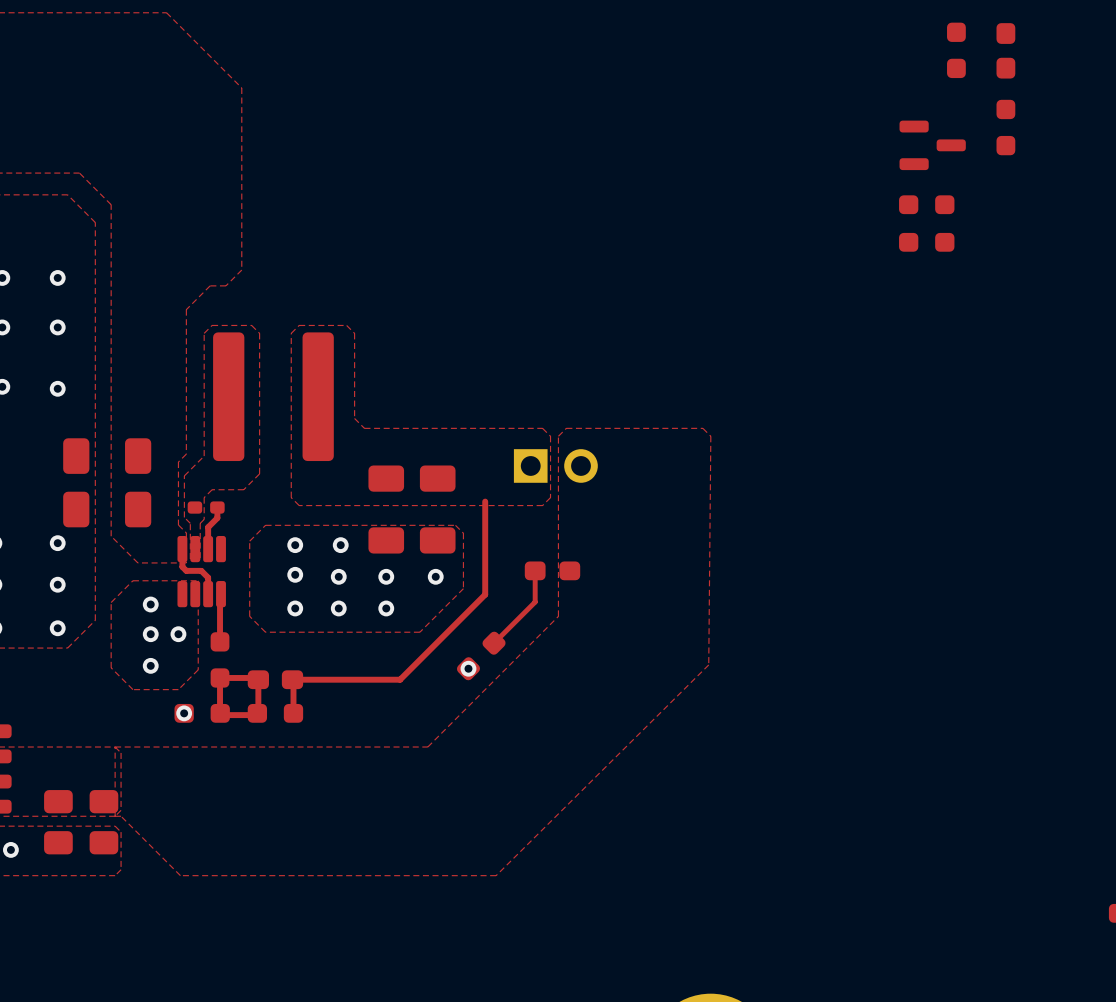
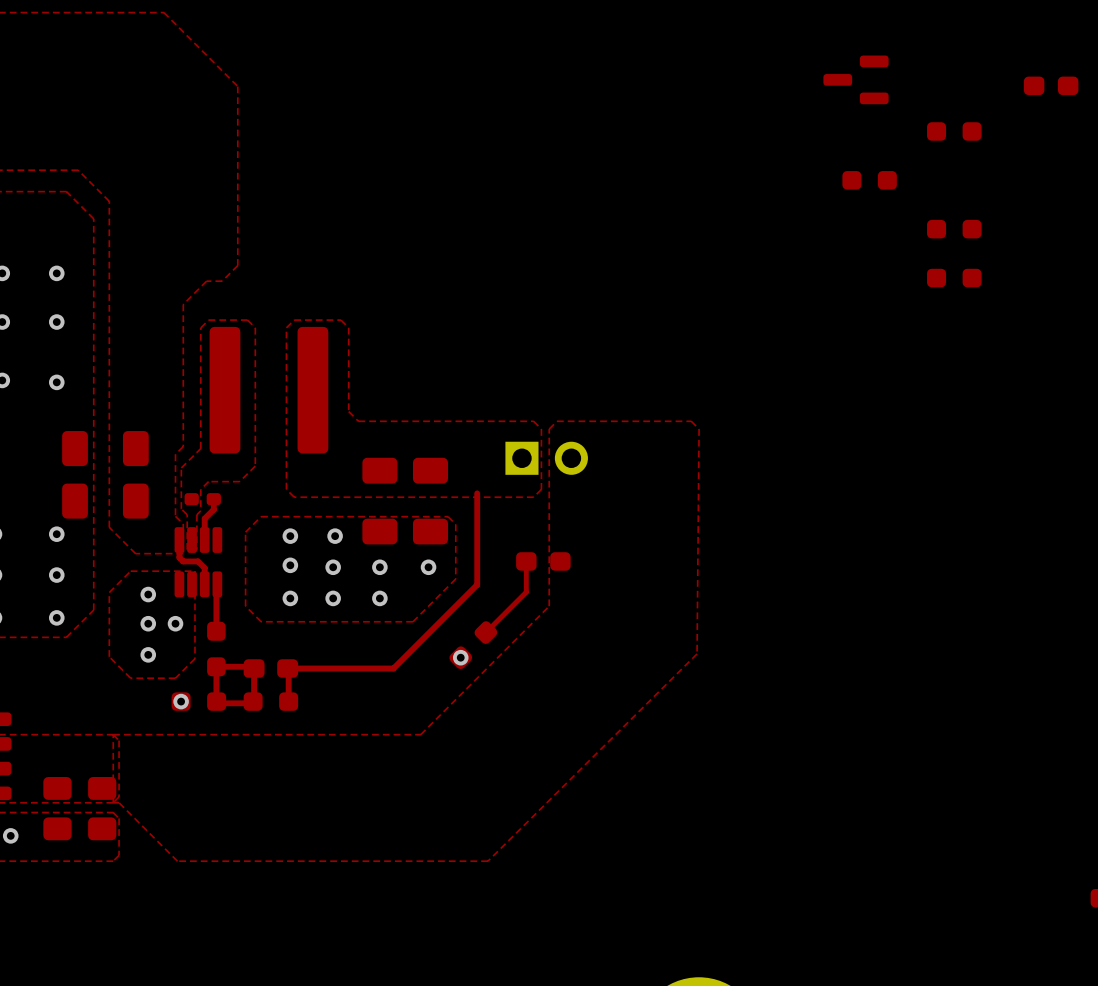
part: (956, 50) -> none
part rotation: 0° (1005, 50) -> 90° clockwise (1051, 85)
part position: (1005, 50) -> (1051, 85)
part rotation: 0° (1005, 127) -> 90° clockwise (954, 131)
part position: (1005, 127) -> (954, 131)
part rotation: 0° (932, 145) -> 180° (856, 79)
part position: (932, 145) -> (856, 79)
part: none -> (869, 180)
part: (926, 204) -> none
part: none -> (954, 229)
part: (926, 242) -> none
part: none -> (954, 278)

